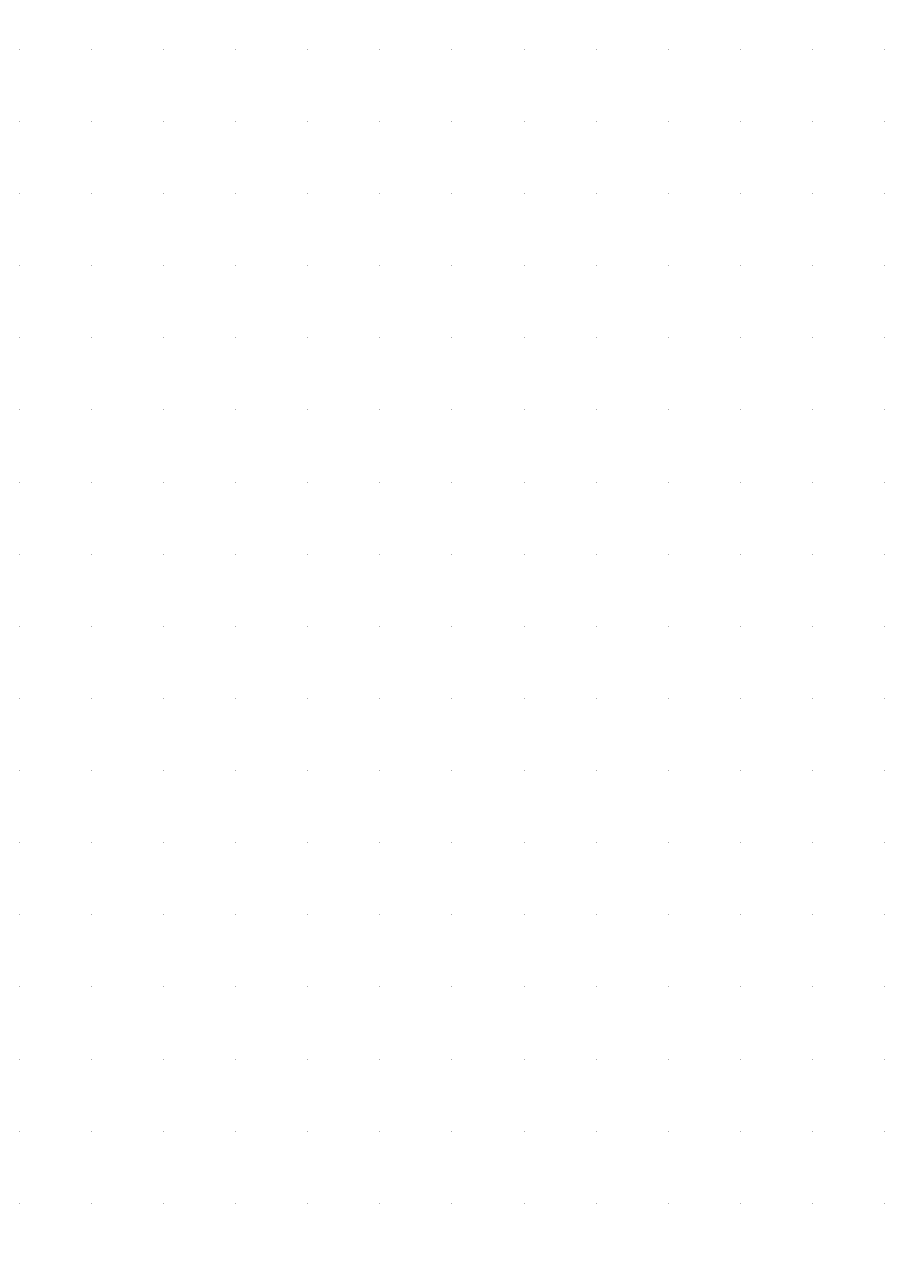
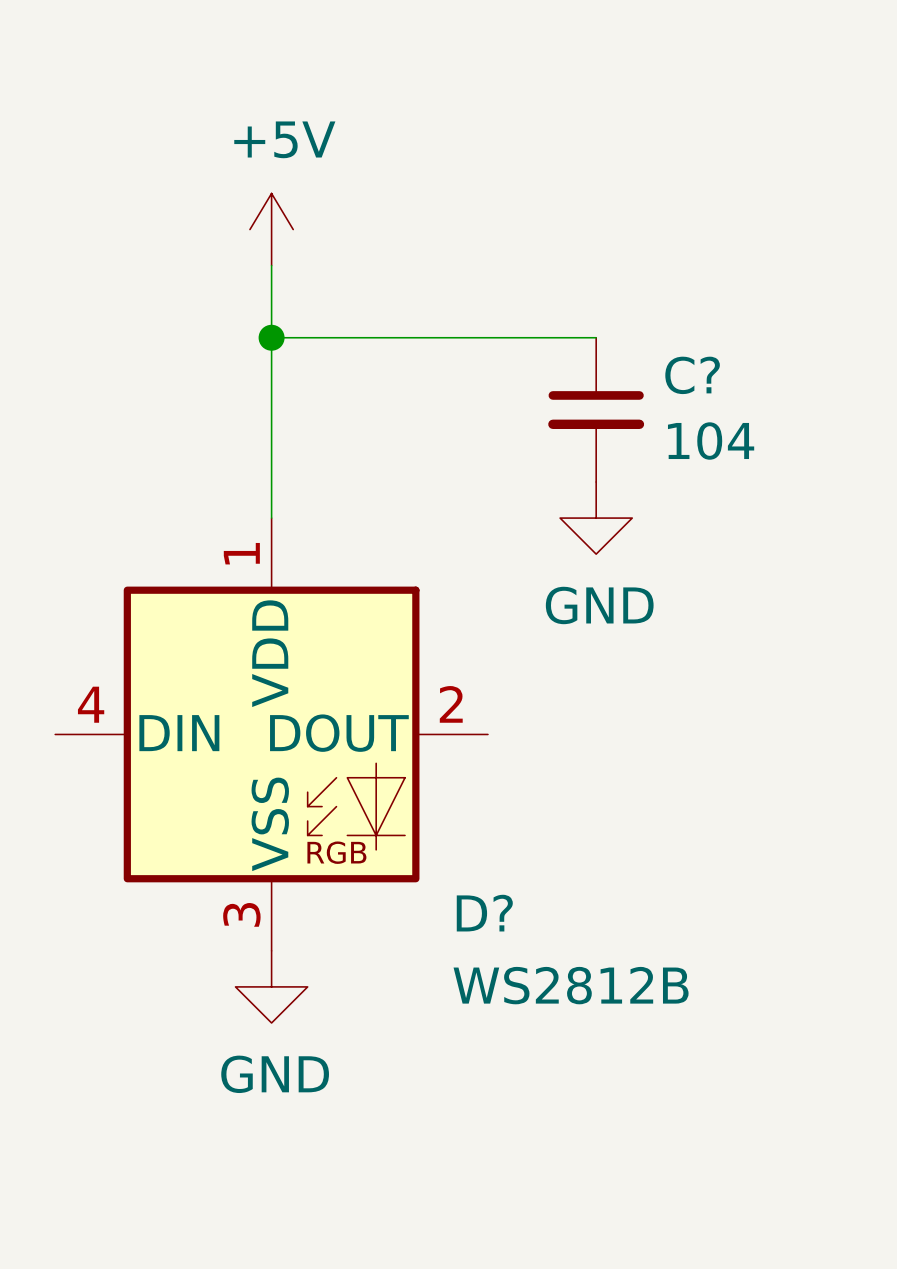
power symbol: none -> +5V (271, 229)
wire: none -> (271, 265) (271, 518)
wire: none -> (271, 337) (596, 337)
junction: none -> (271, 337)
C?: none -> 104 (596, 409)
power symbol: none -> GND (596, 518)
D?: none -> WS2812B (271, 734)
power symbol: none -> GND (271, 986)

